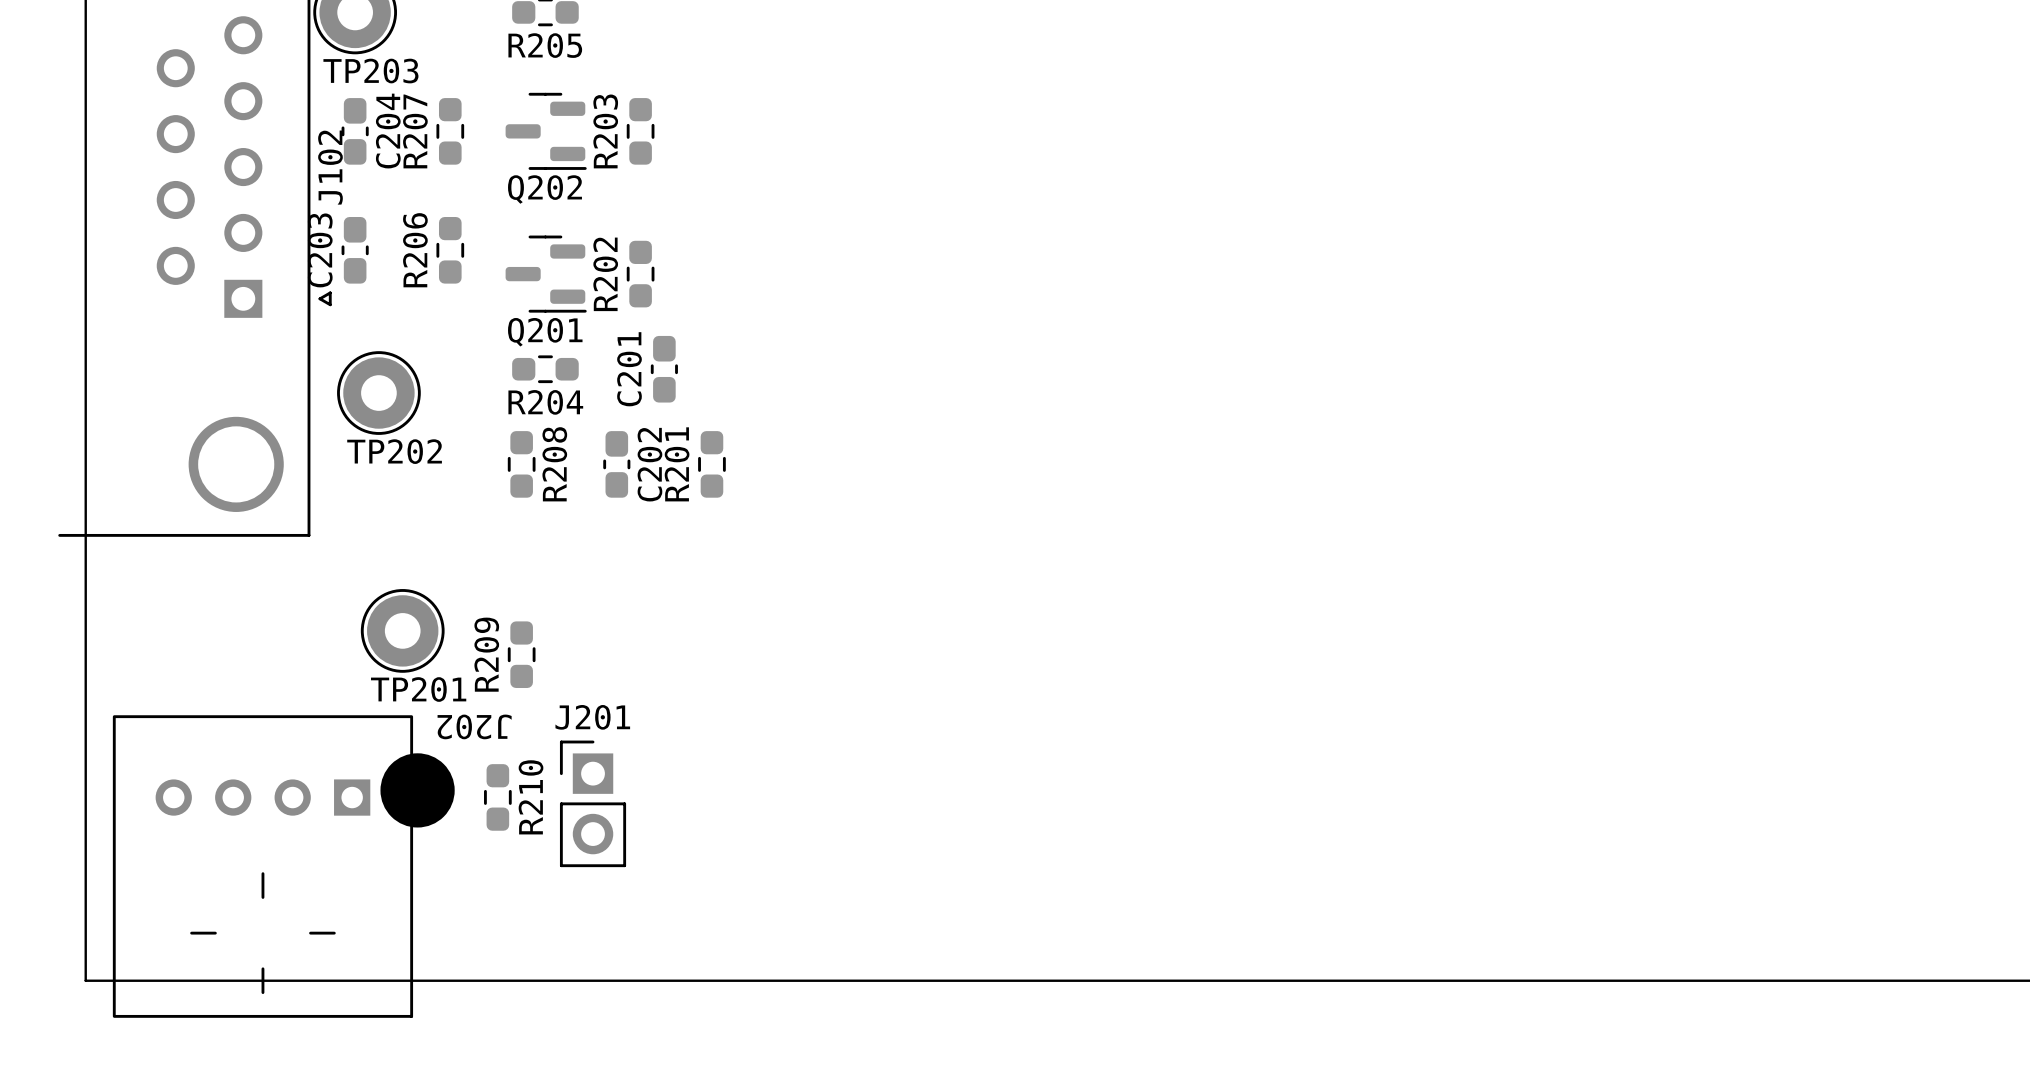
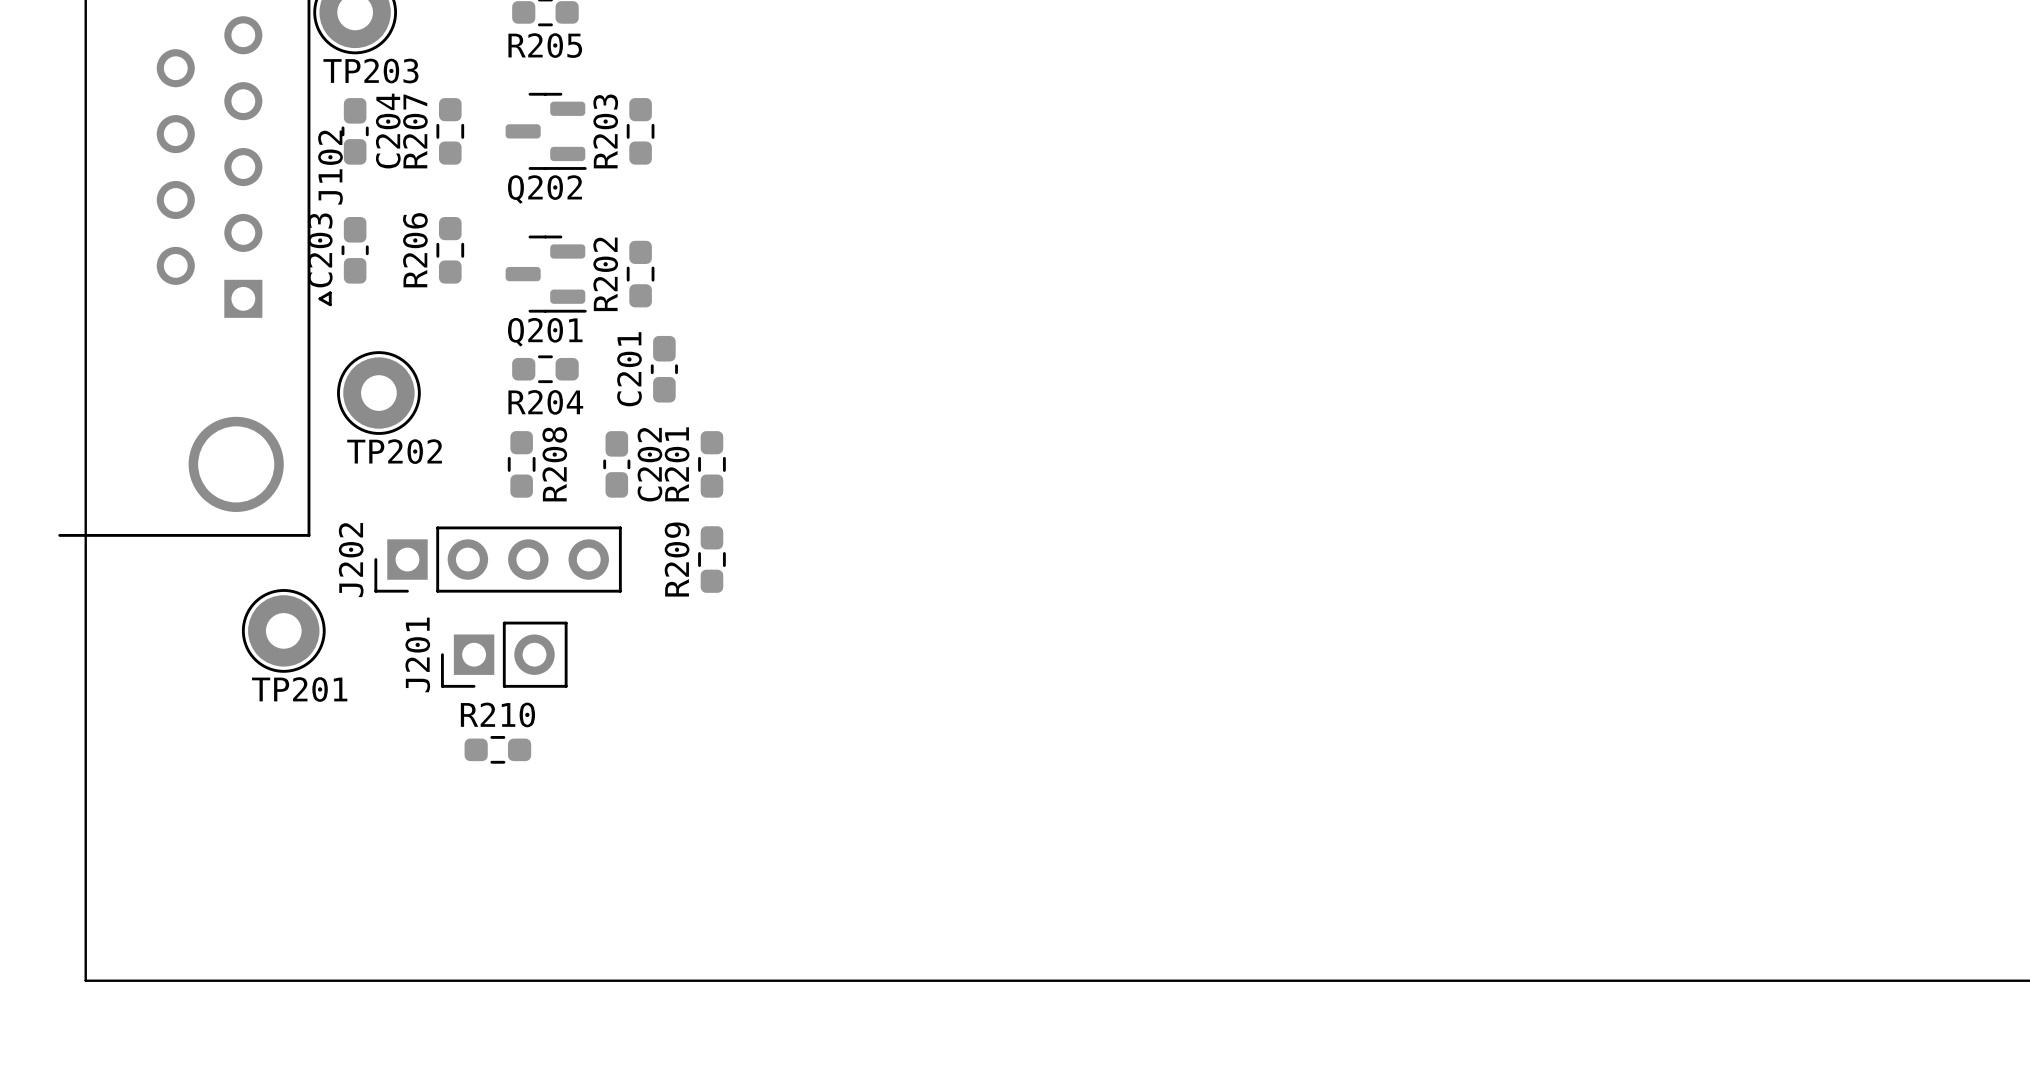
TP201 position: (402, 630) -> (283, 630)
R209 position: (521, 654) -> (711, 559)
J202 footprint: [112, 715, 455, 1018] -> [374, 526, 622, 593]
J202 name position: J202 (474, 726) -> J202 (351, 560)
R210 rotation: 0° (497, 797) -> 90° clockwise (497, 749)
R210 position: (497, 797) -> (497, 749)
R210 name position: R210 (531, 797) -> R210 (497, 714)
J201 rotation: 0° (593, 803) -> 90° counterclockwise (504, 654)
J201 position: (593, 803) -> (504, 654)

